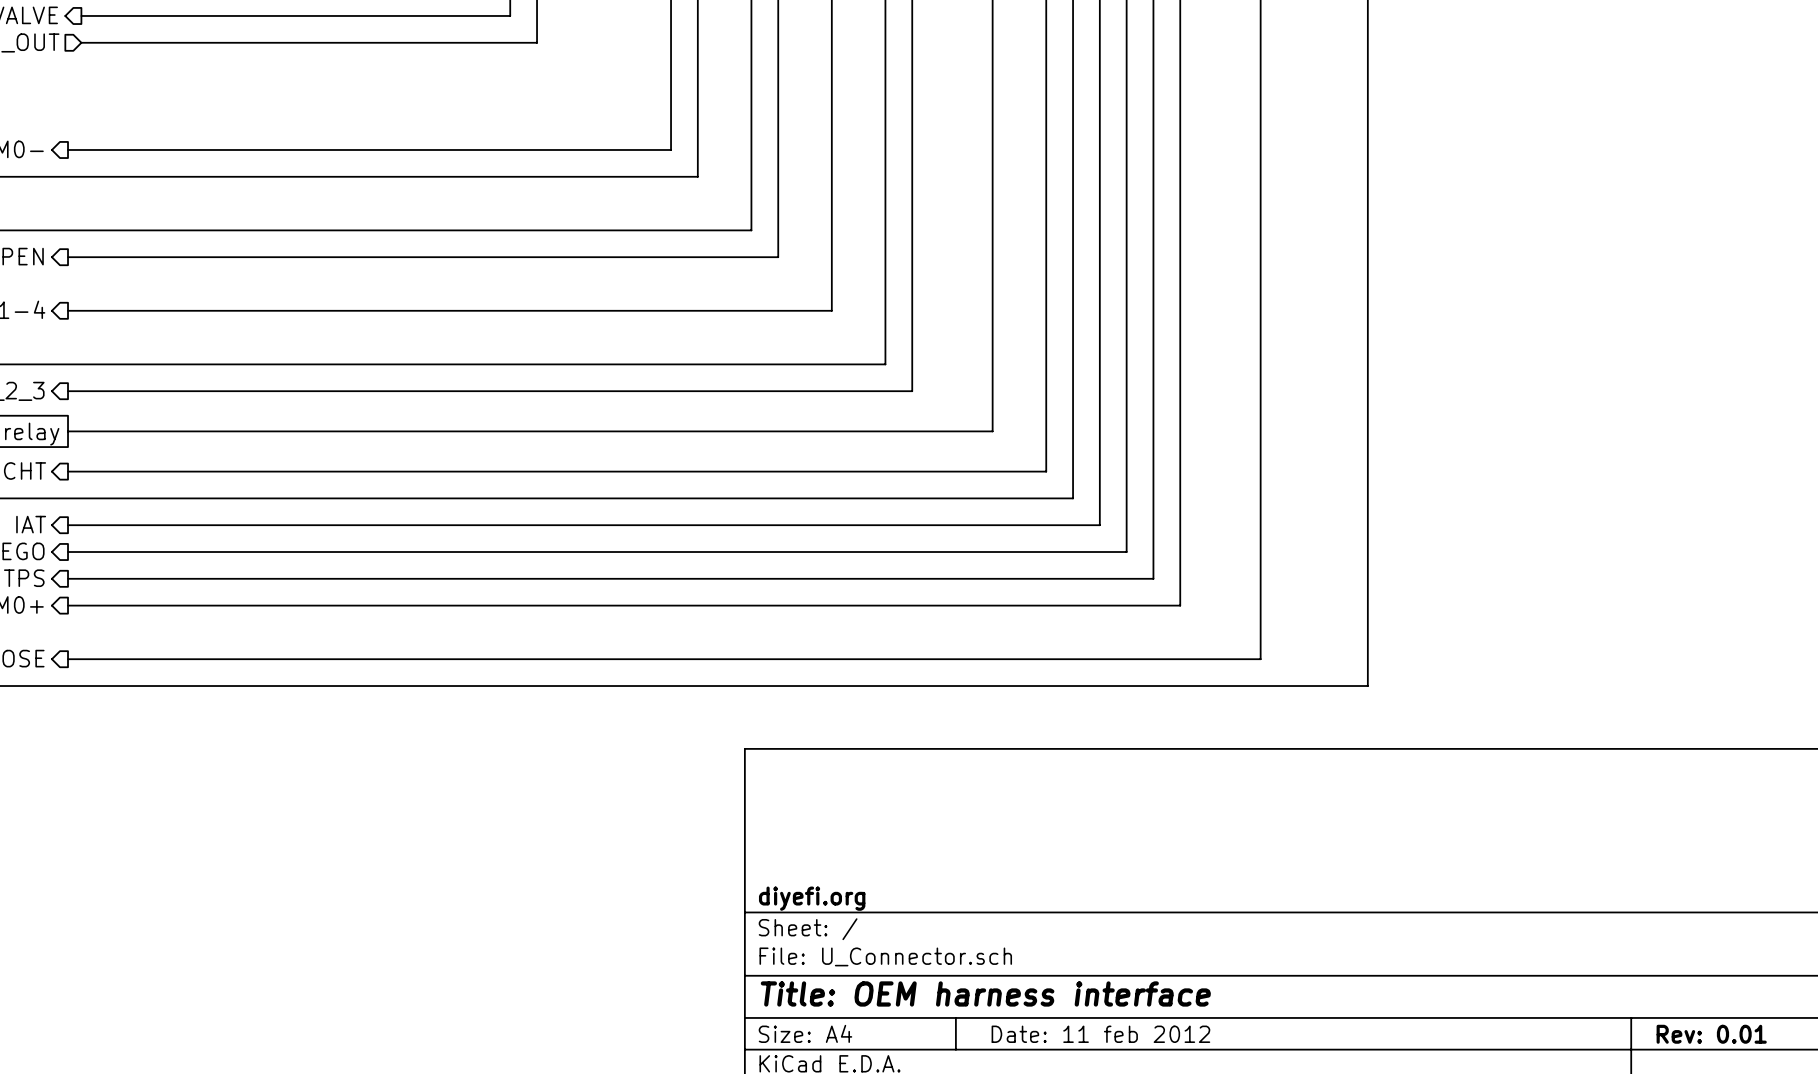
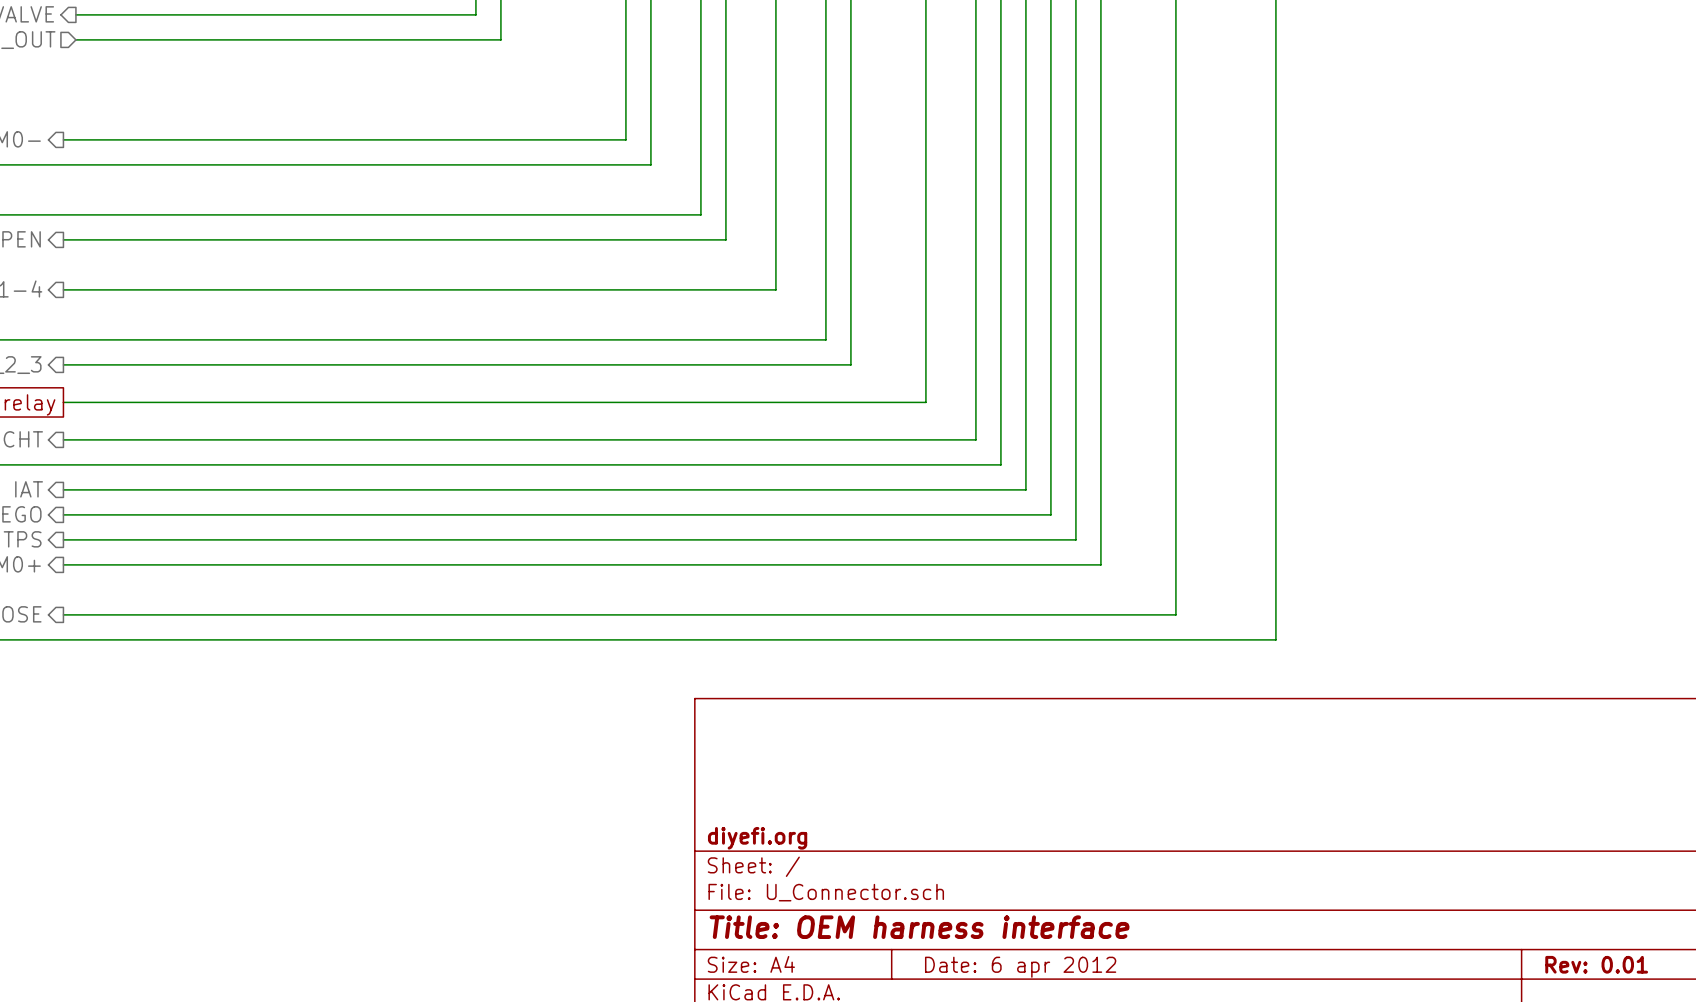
title block: Date: 11 feb 2012 (1100, 1034) -> Date: 6 apr 2012 (1020, 967)

